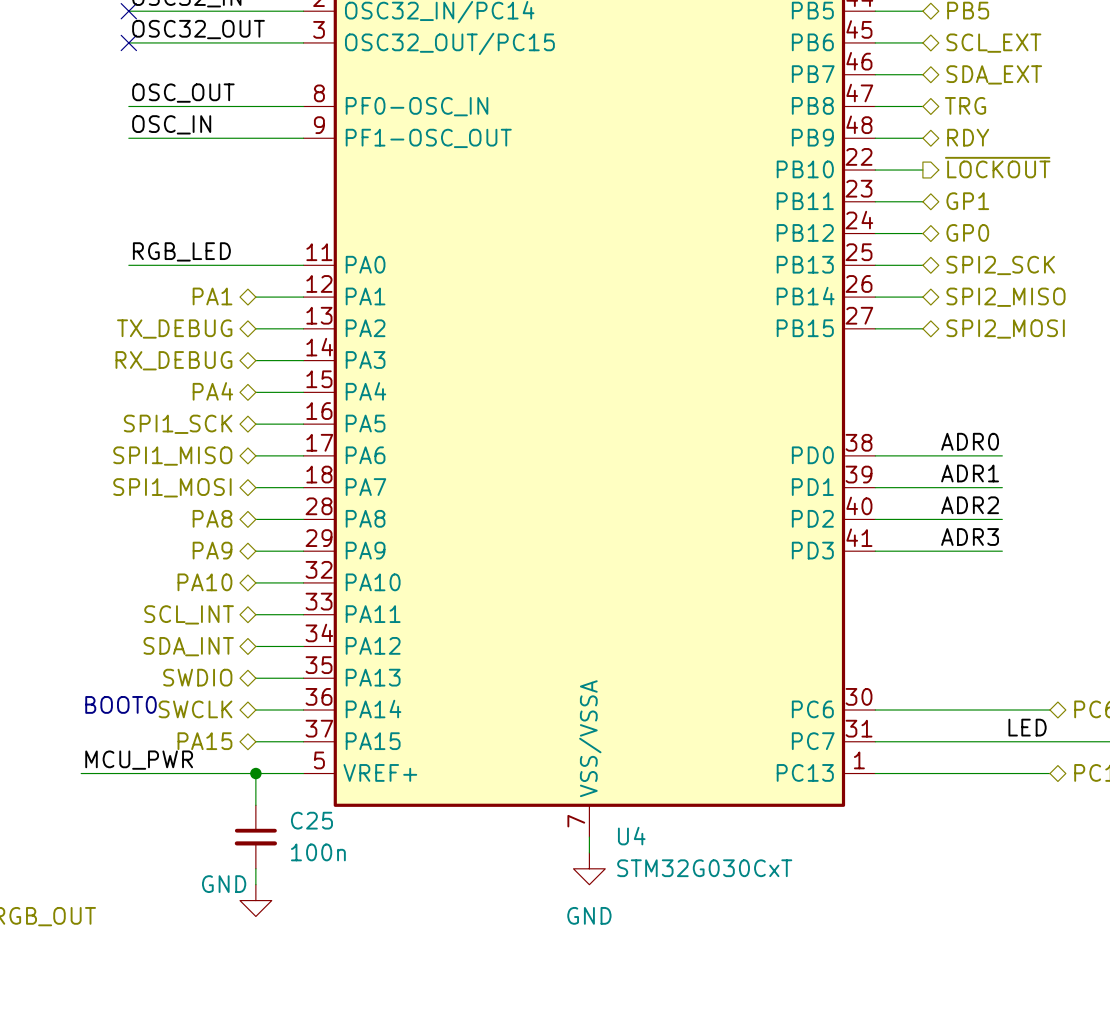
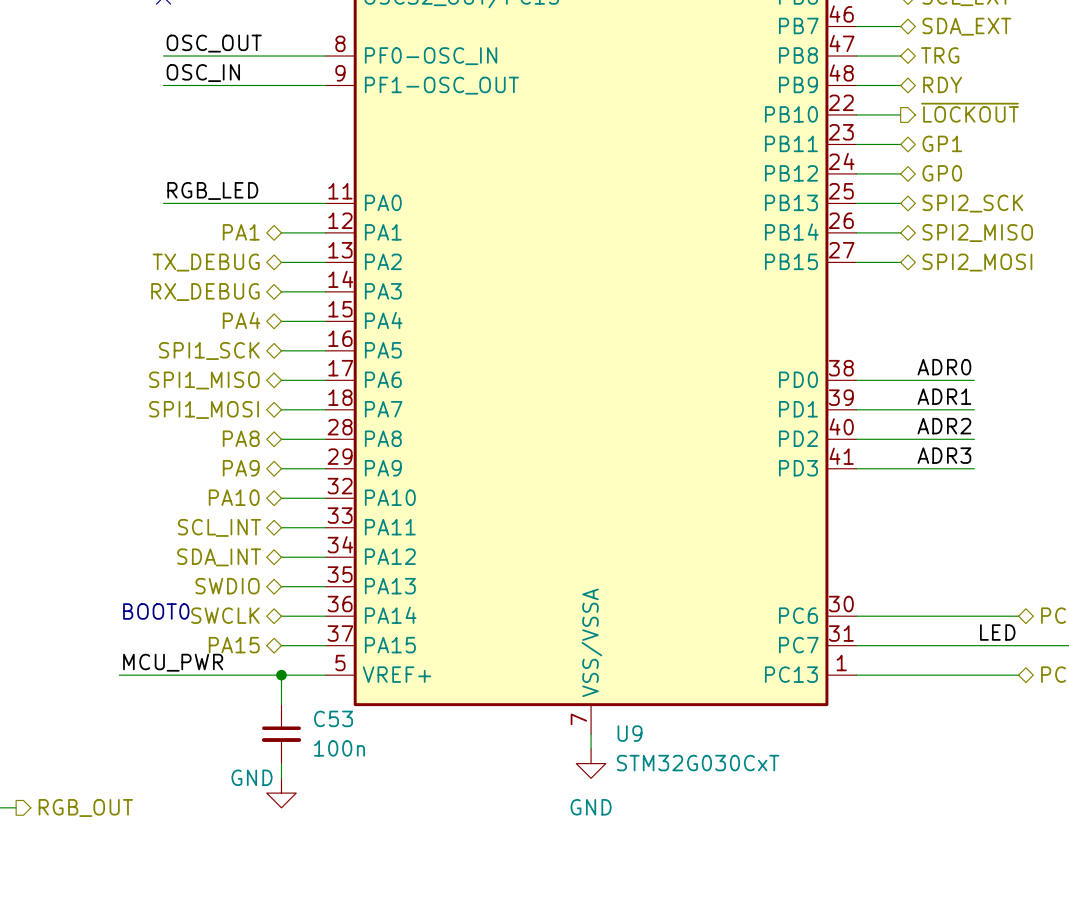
C25 name: C25 (311, 820) -> C53 (333, 718)
U4 name: U4 (631, 836) -> U9 (630, 733)

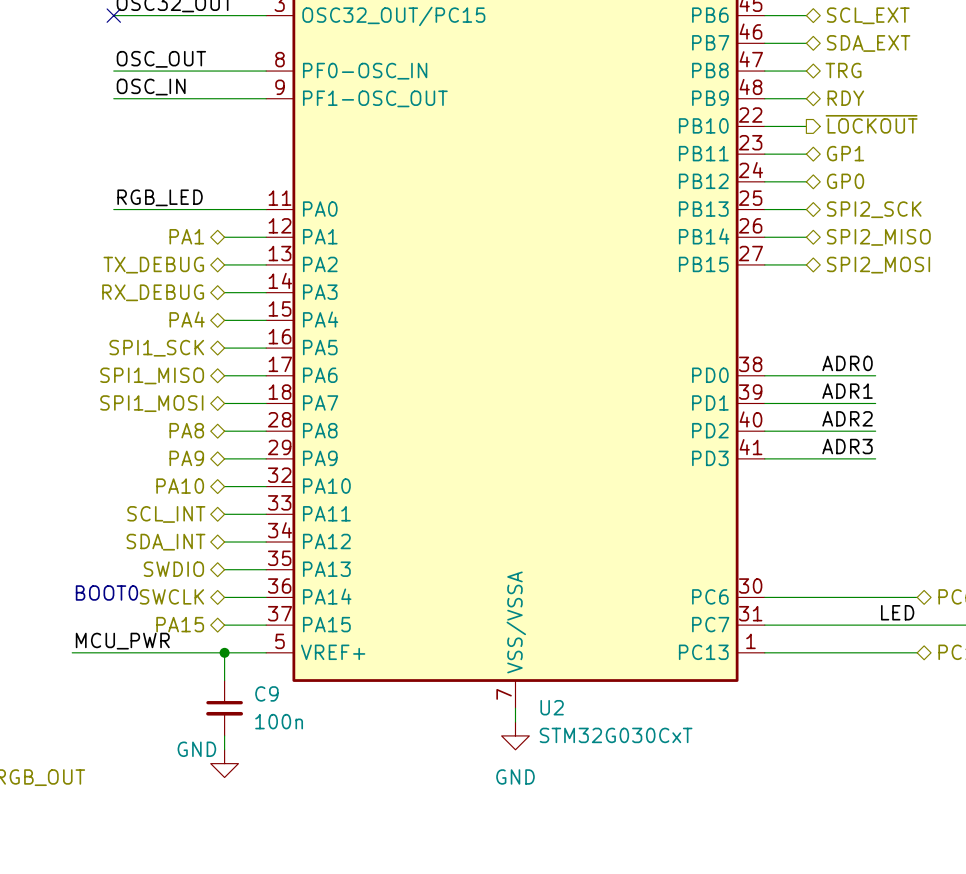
C53 name: C53 (333, 718) -> C9 (266, 693)
U9 name: U9 (630, 733) -> U2 (552, 707)

